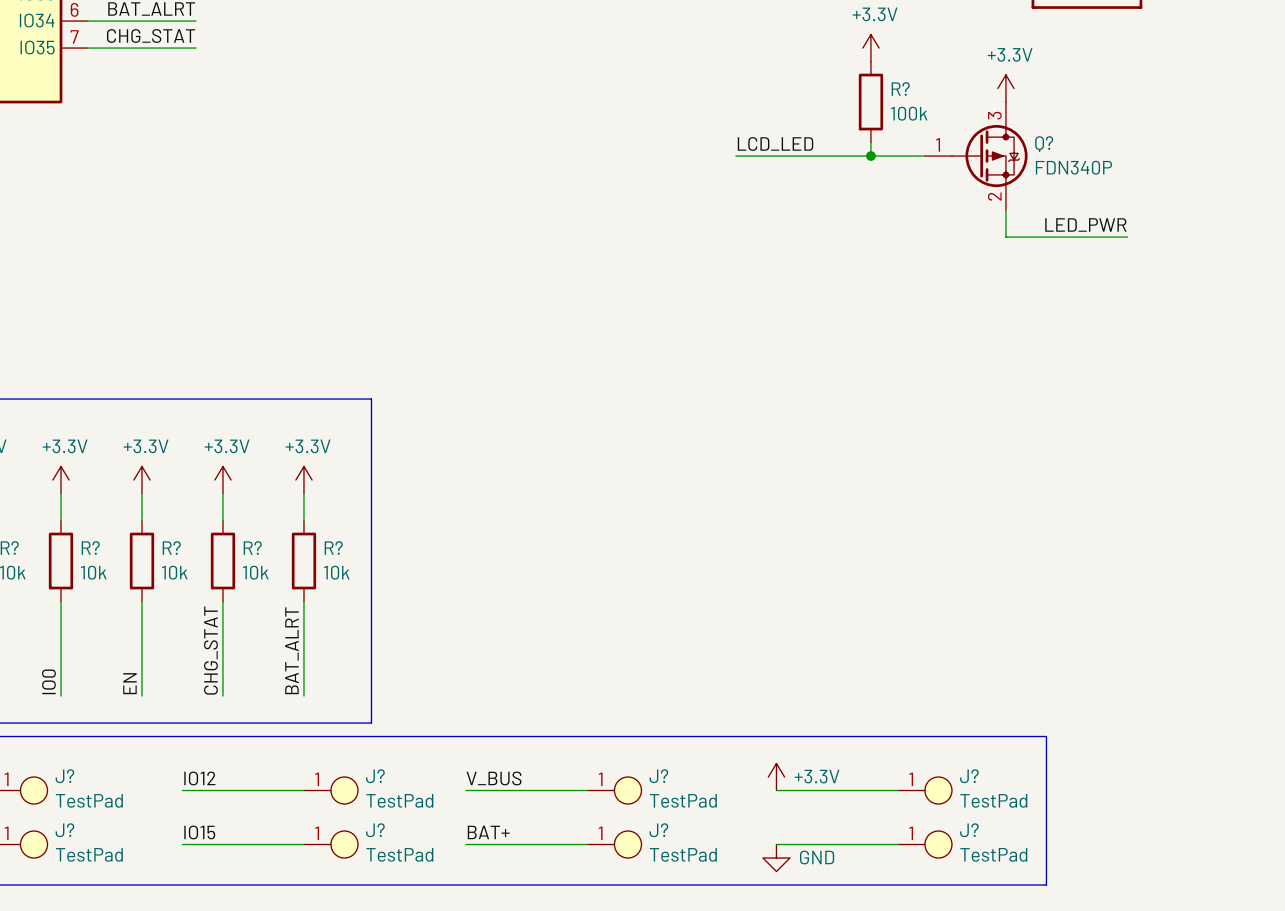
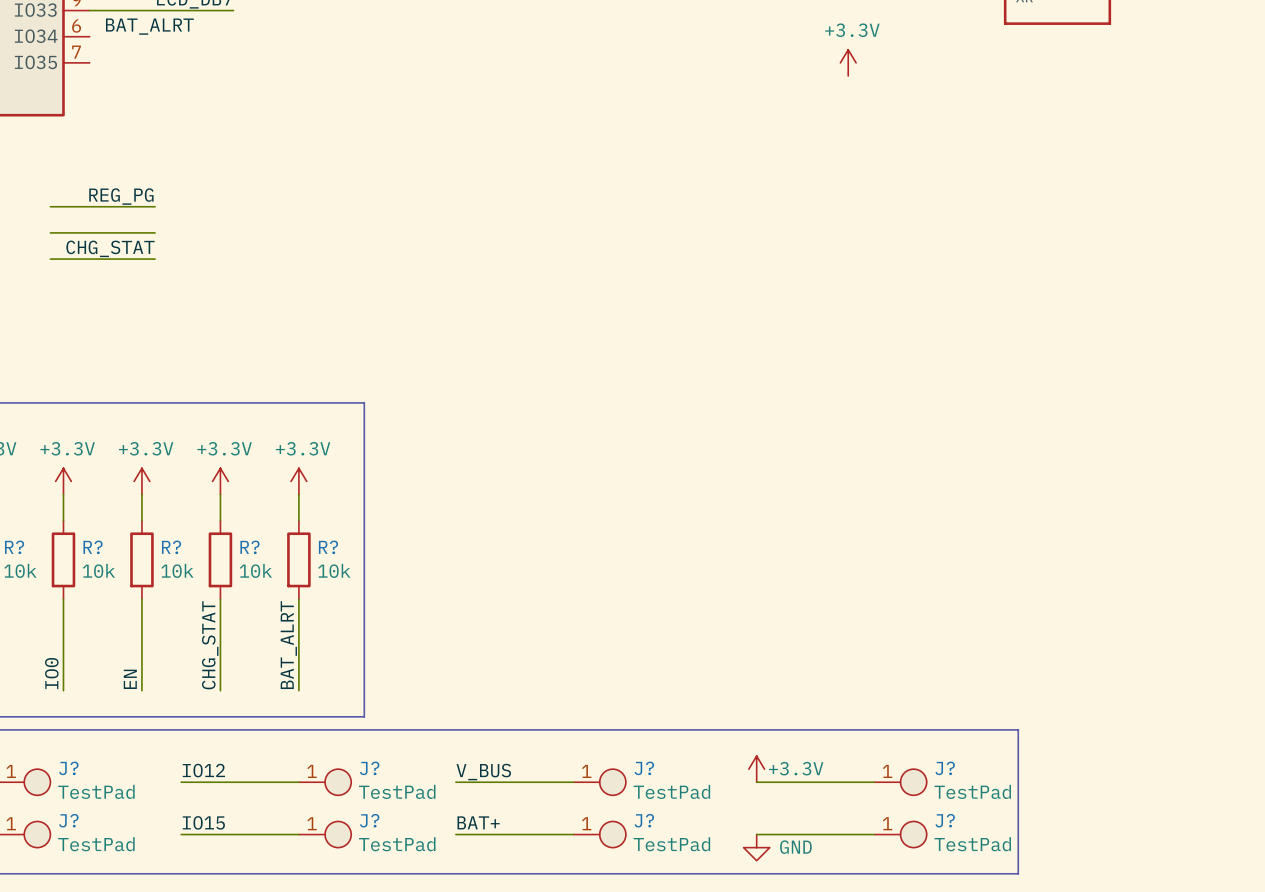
wire: (87, 21) (195, 21) -> (50, 232) (155, 232)
label position: CHG_STAT (151, 36) -> CHG_STAT (110, 248)
wire: (87, 48) (195, 48) -> (50, 259) (155, 259)
power symbol: +3.3V (1005, 88) -> none
R?: 100k (870, 102) -> none
wire: (870, 142) (870, 156) -> none
label: LCD_LED (775, 144) -> none
wire: (735, 156) (924, 156) -> none
junction: (870, 156) -> none
Q?: FDN340P (976, 156) -> none
label: none -> REG_PG (121, 196)
wire: none -> (50, 206) (155, 206)
wire: (1005, 210) (1005, 237) (1127, 237) -> none
label: LED_PWR (1085, 224) -> none

